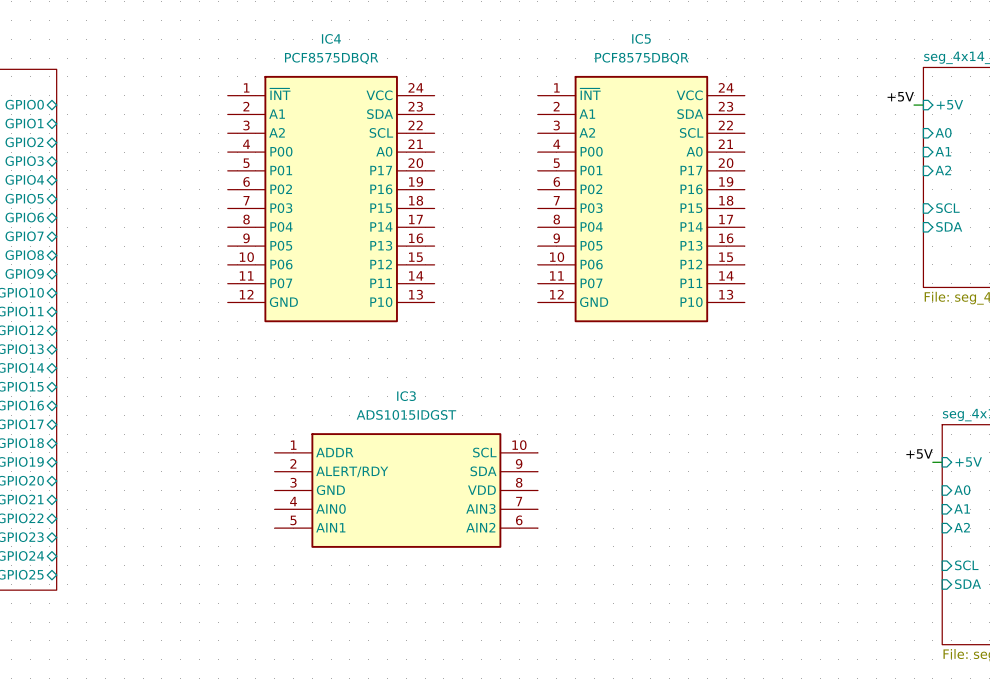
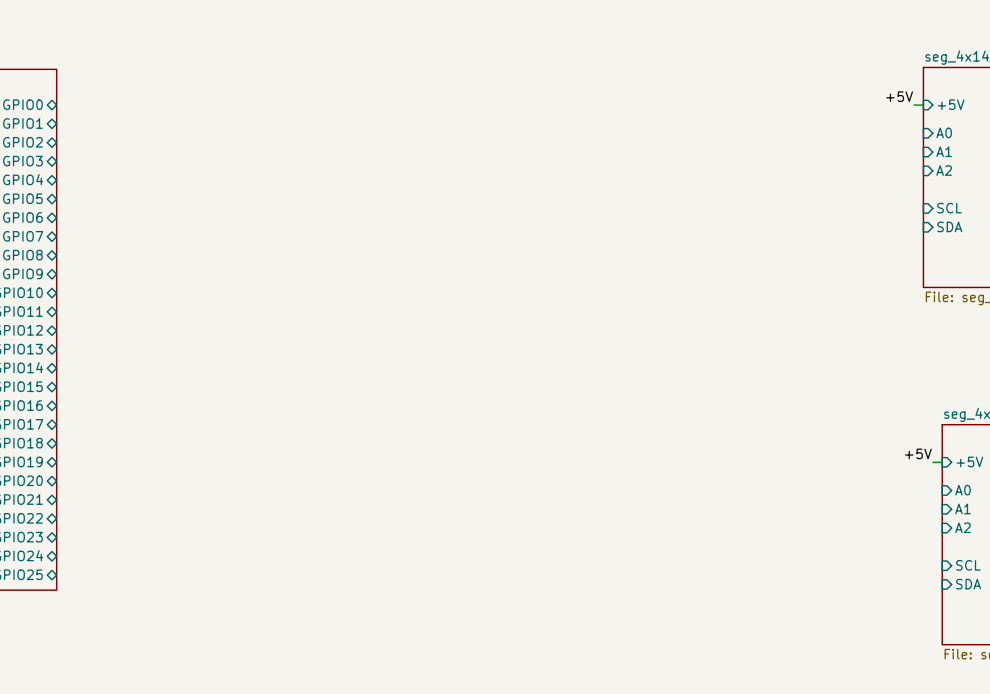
IC4: PCF8575DBQR (331, 199) -> none
IC5: PCF8575DBQR (641, 199) -> none
IC3: ADS1015IDGST (406, 490) -> none

